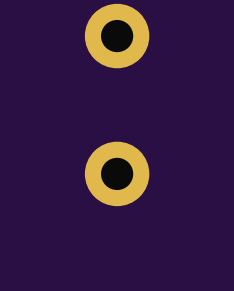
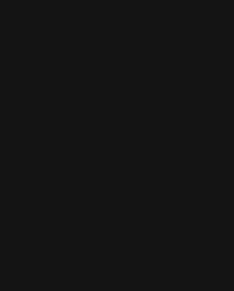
part: (117, 36) -> none
part: (117, 173) -> none

